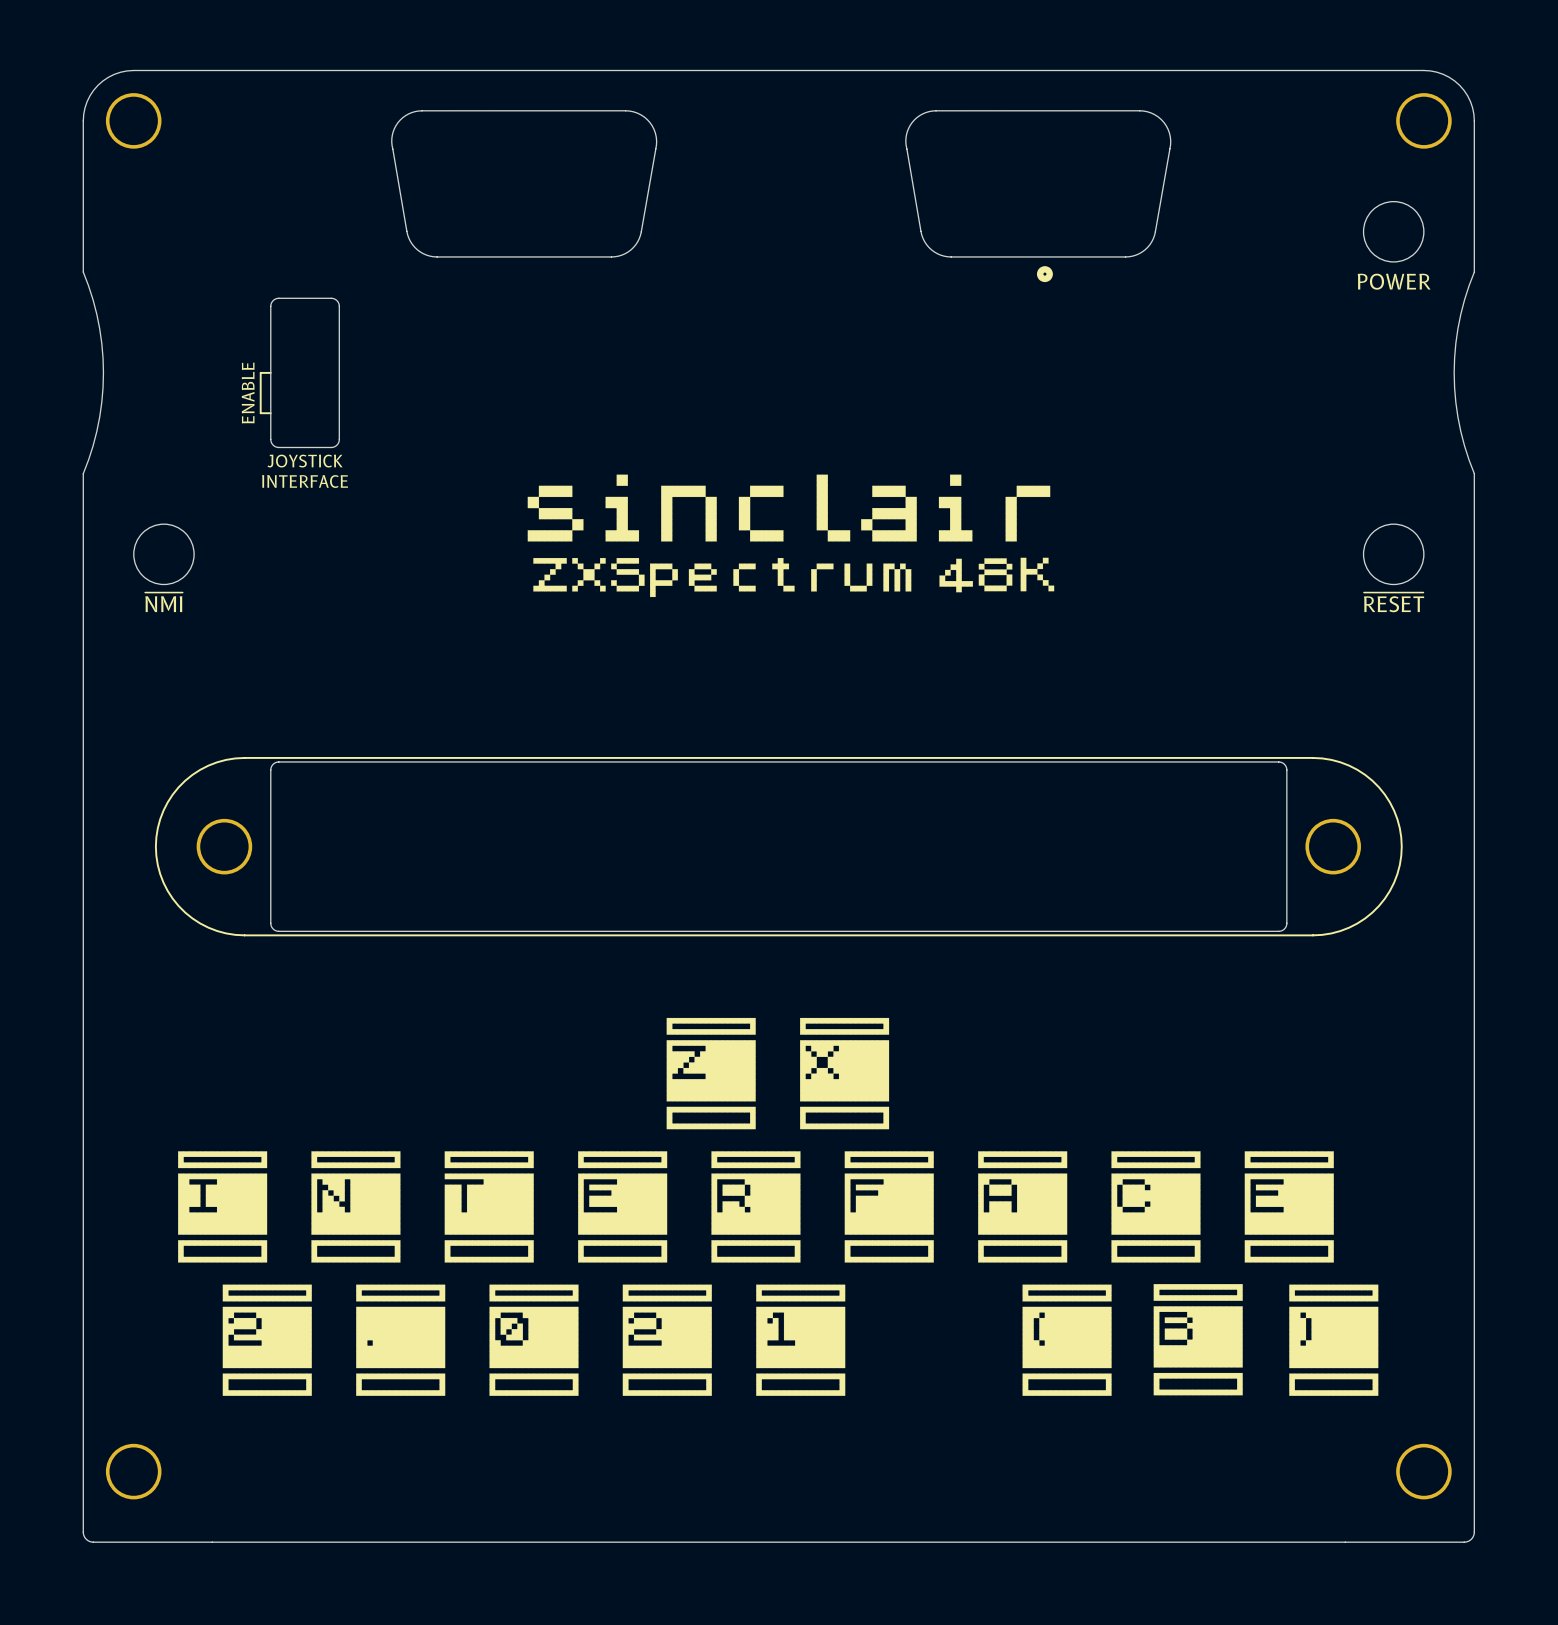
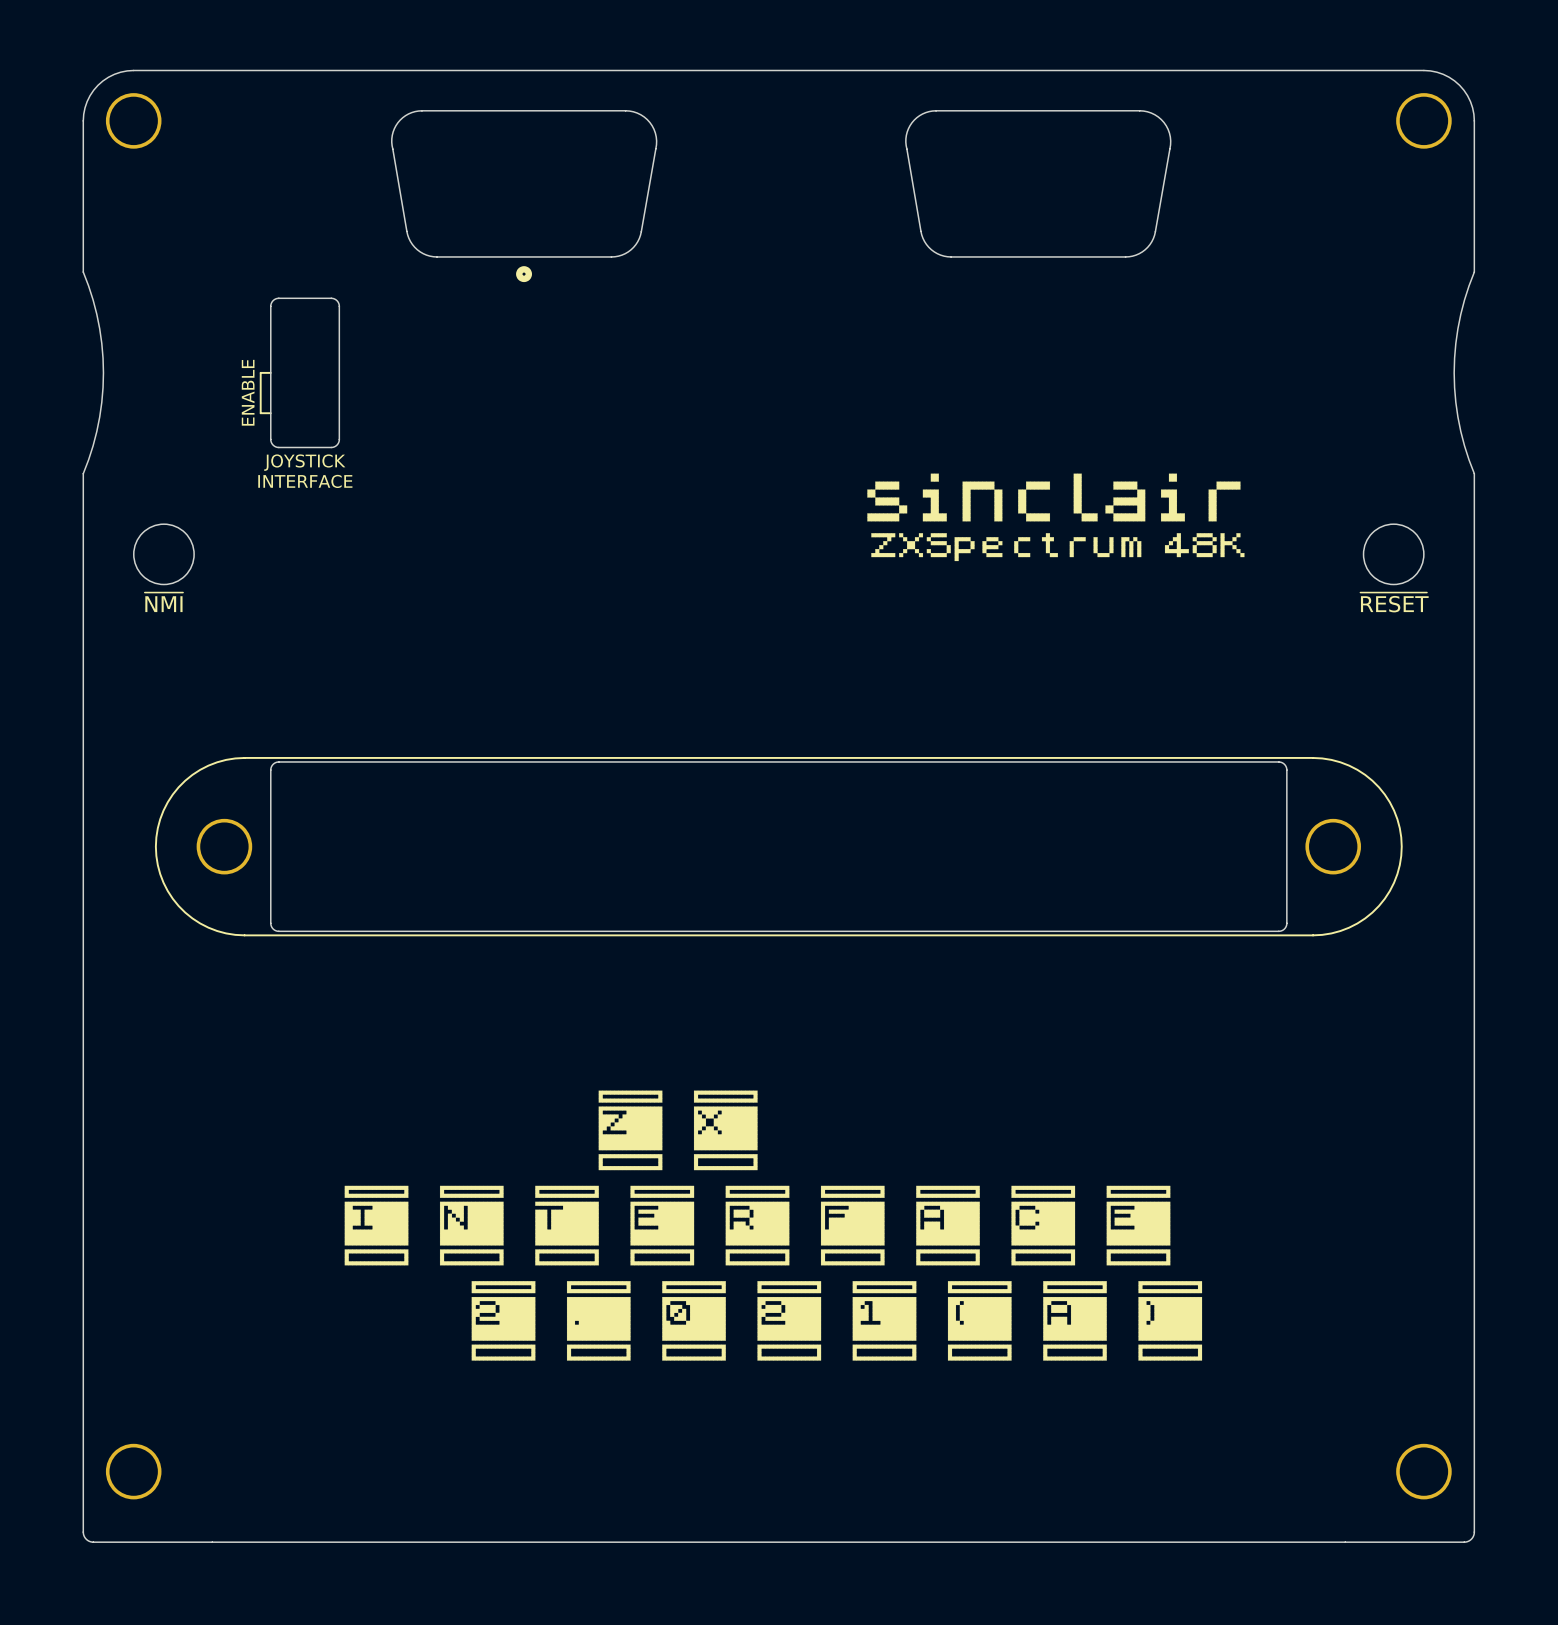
round board edge: [1363, 201, 1425, 263] -> none
drawing: none -> [516, 266, 533, 283]
drawing: [1036, 266, 1053, 283] -> none
text: POWER (1394, 281) -> none
drawing: none -> [867, 473, 1245, 562]
drawing: [527, 474, 1055, 598] -> none
drawing: [178, 1017, 1379, 1396] -> none
drawing: none -> [344, 1090, 1203, 1361]

